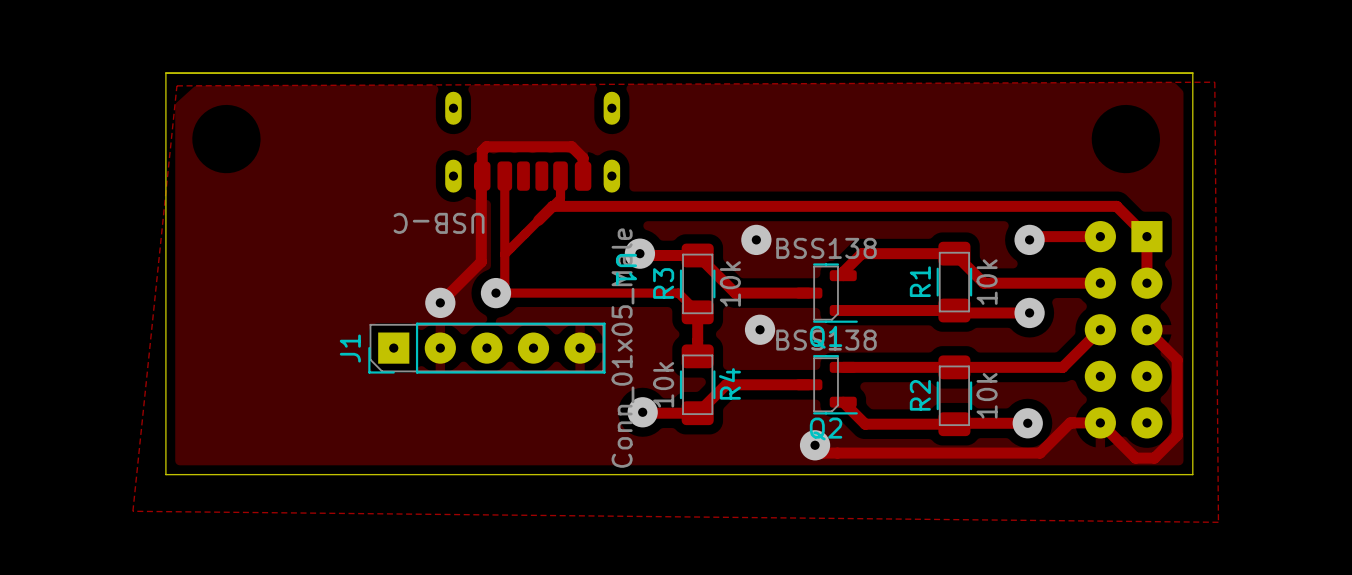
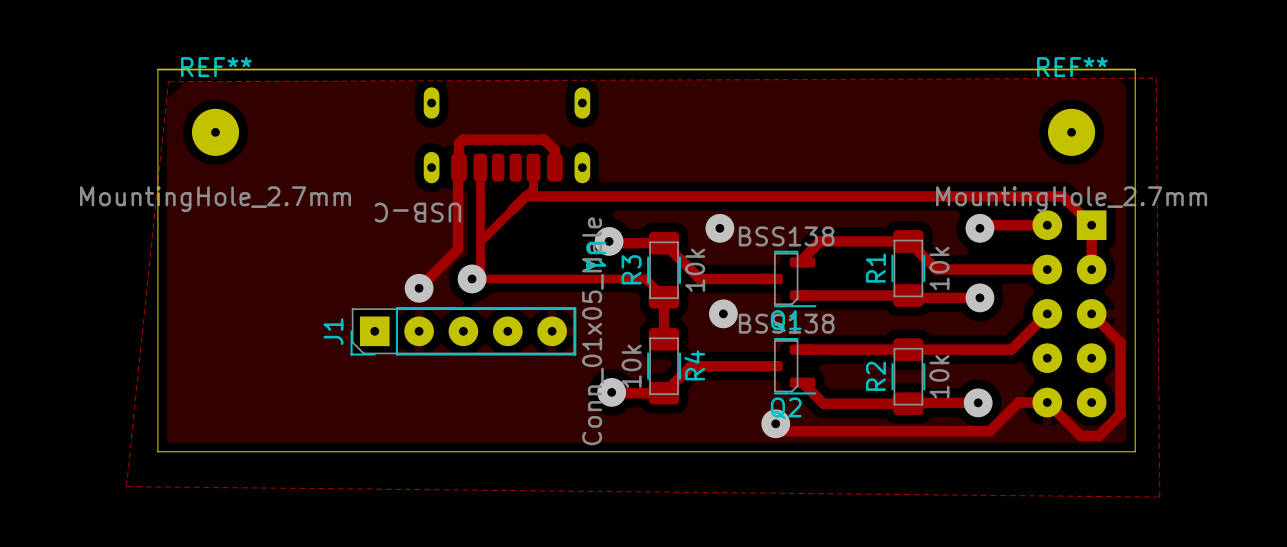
REF**: none -> MountingHole_2.7mm (215, 132)
REF**: none -> MountingHole_2.7mm (1071, 132)

